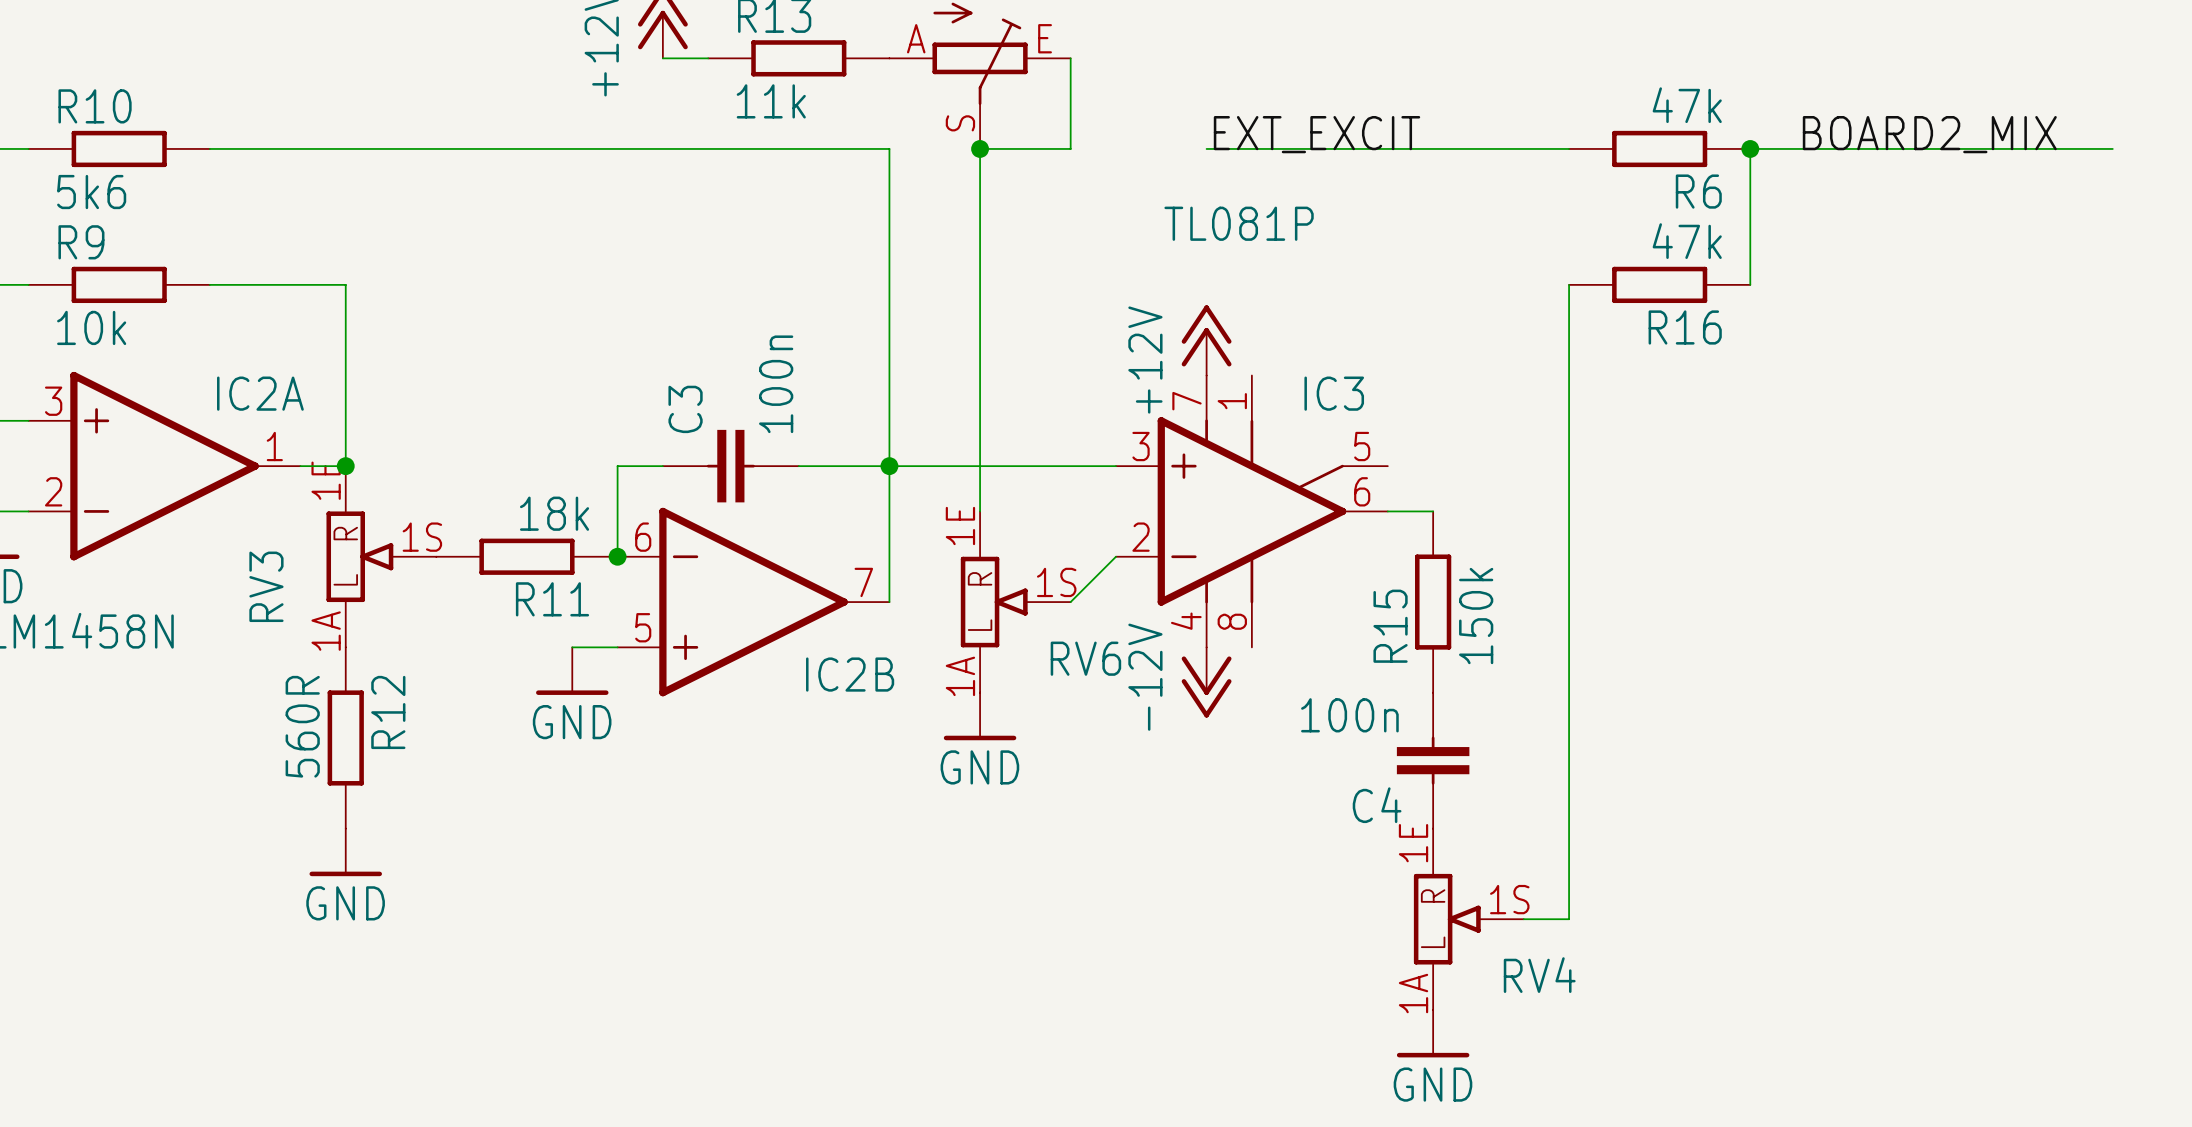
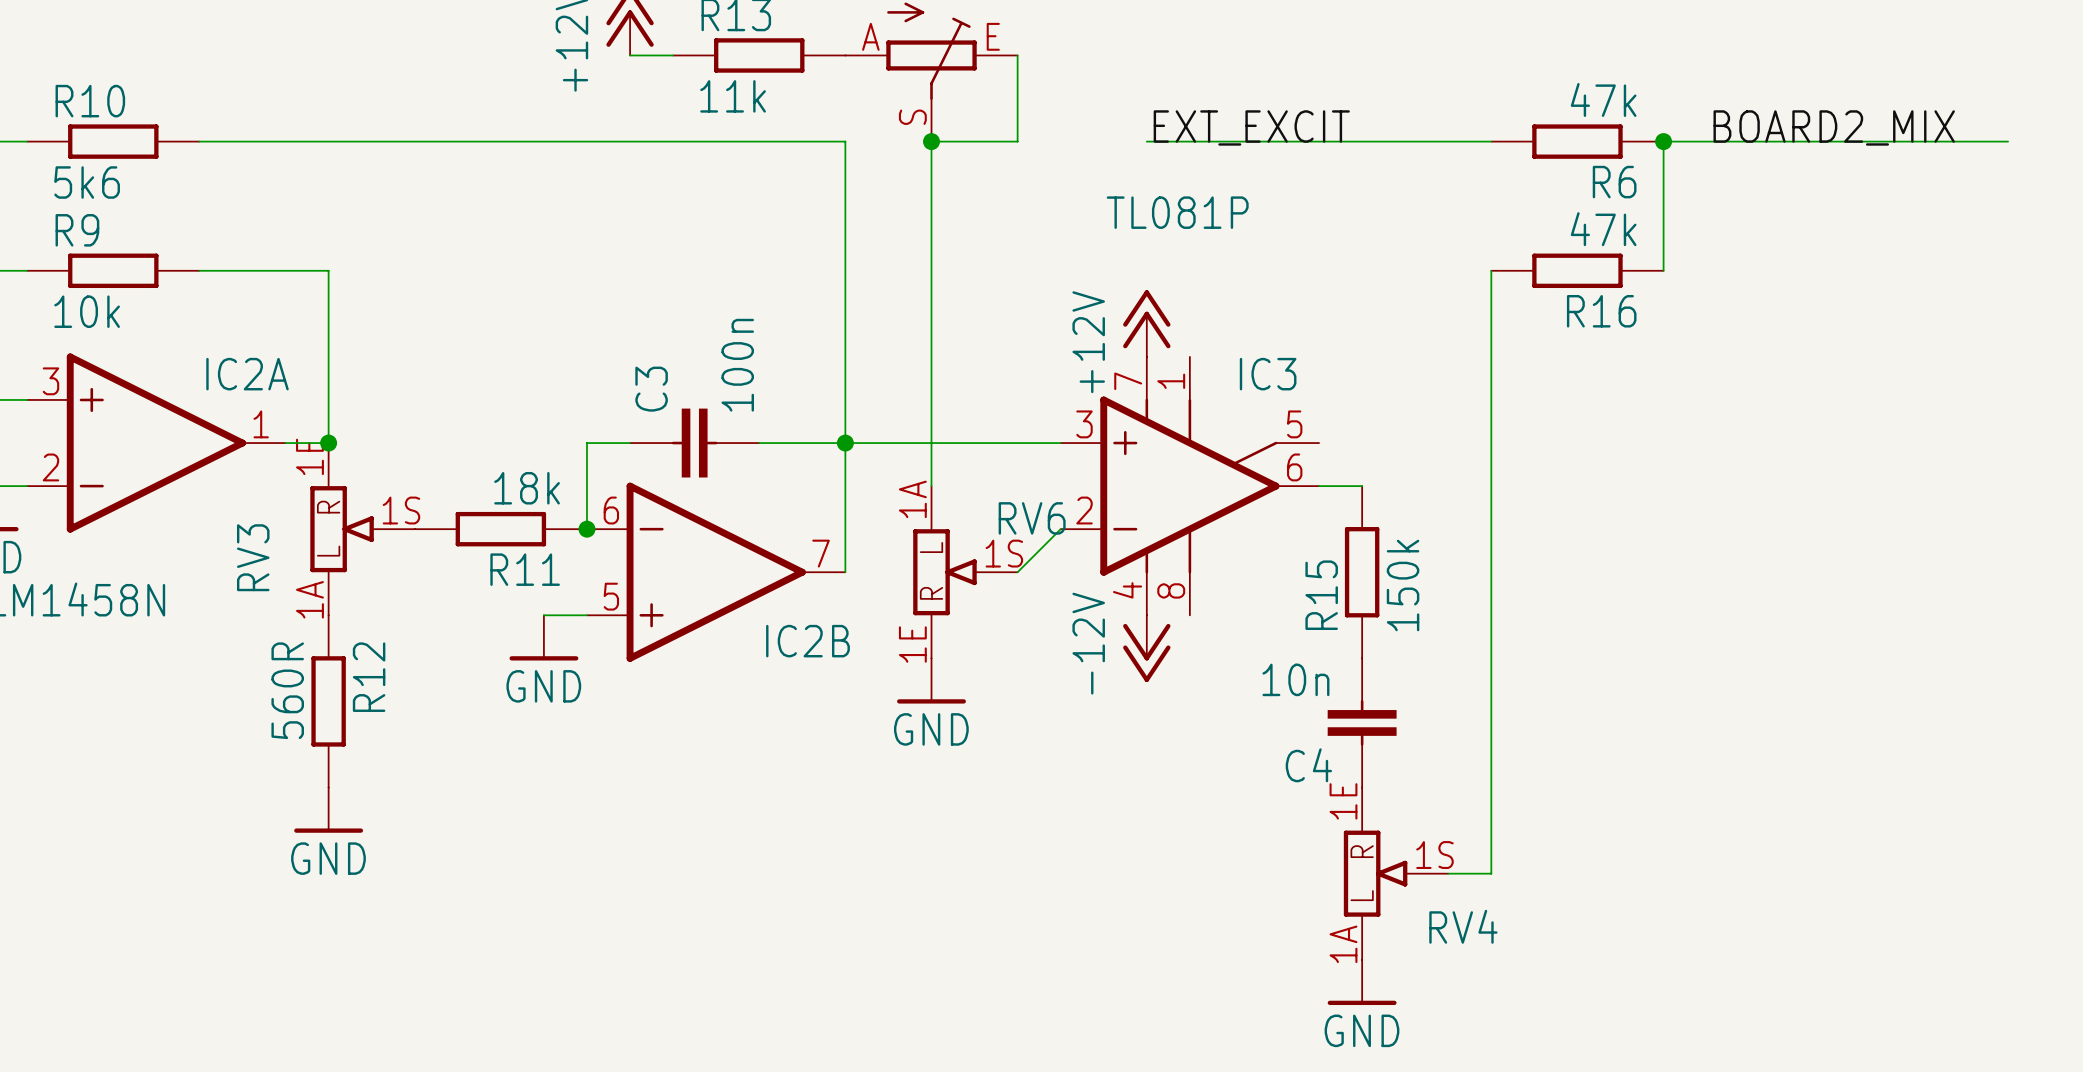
RV6 flip: as is (994, 602) -> up-down (944, 572)
C4 value: 100n (1349, 715) -> 10n (1295, 679)

